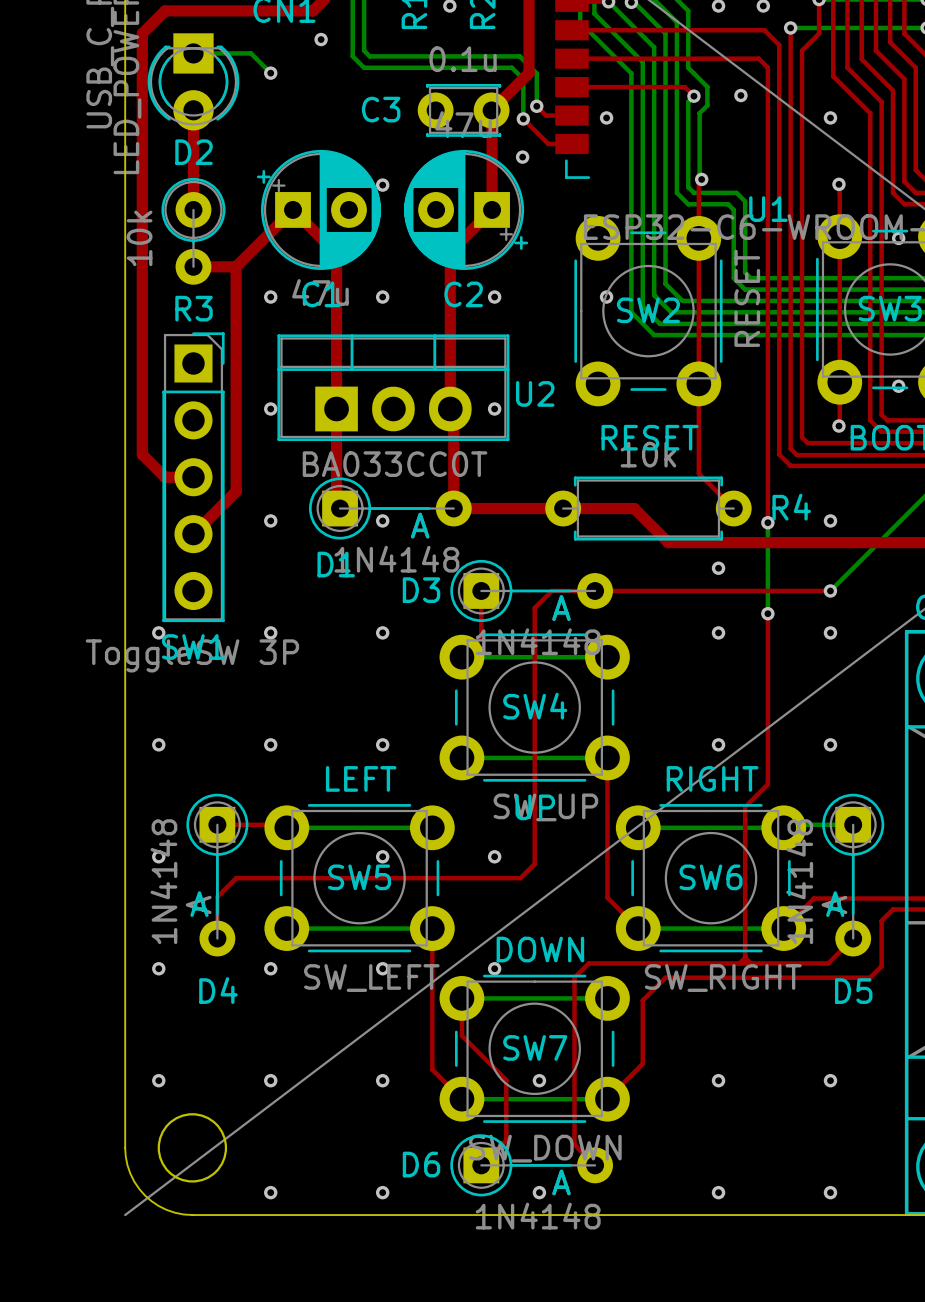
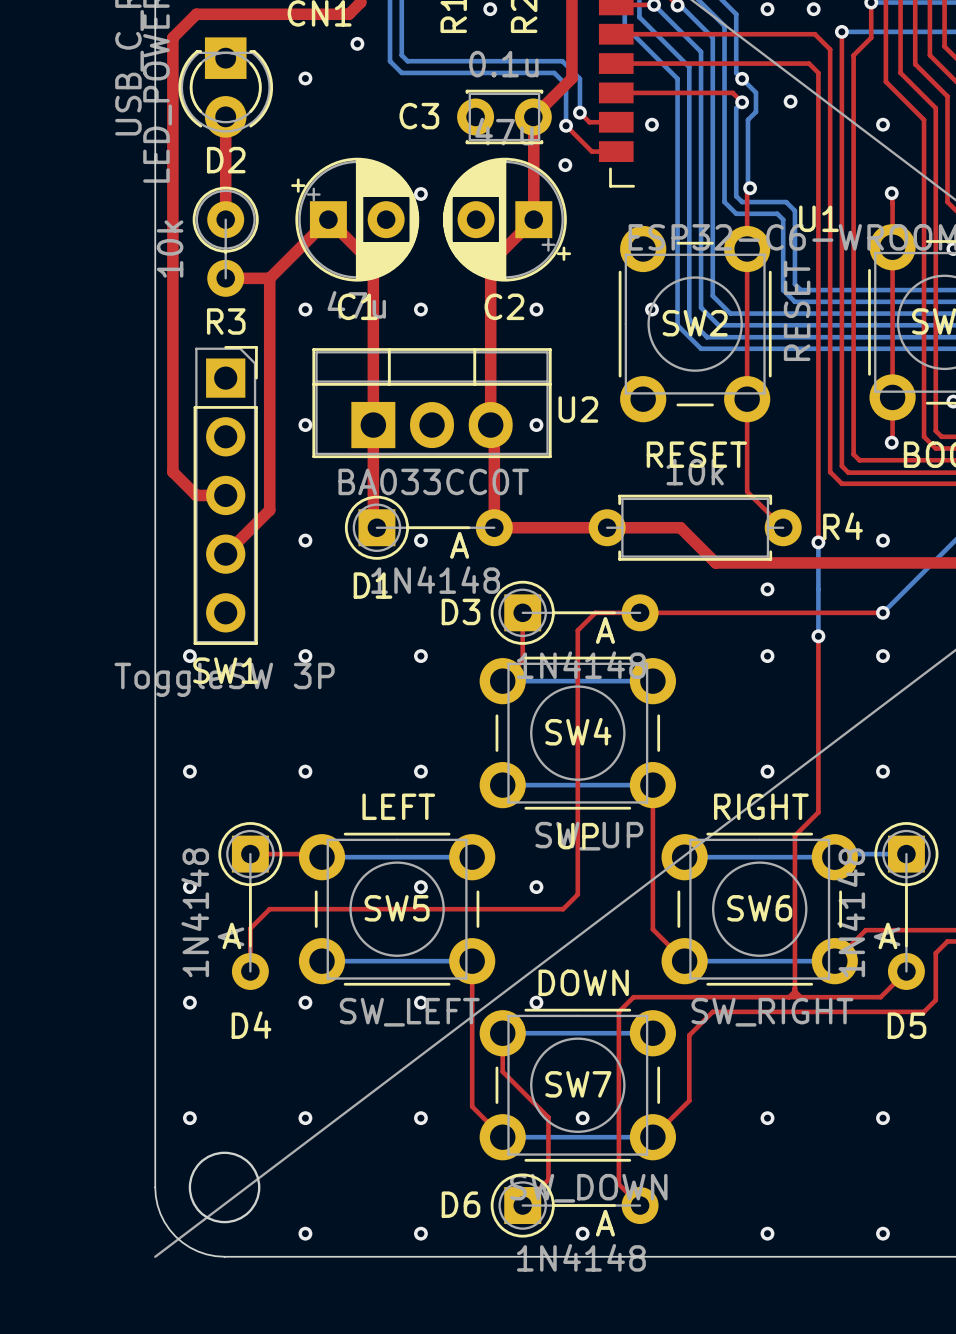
bottom track: (193, 53) (251, 53) (270, 73) -> none
via: none -> (742, 78)

